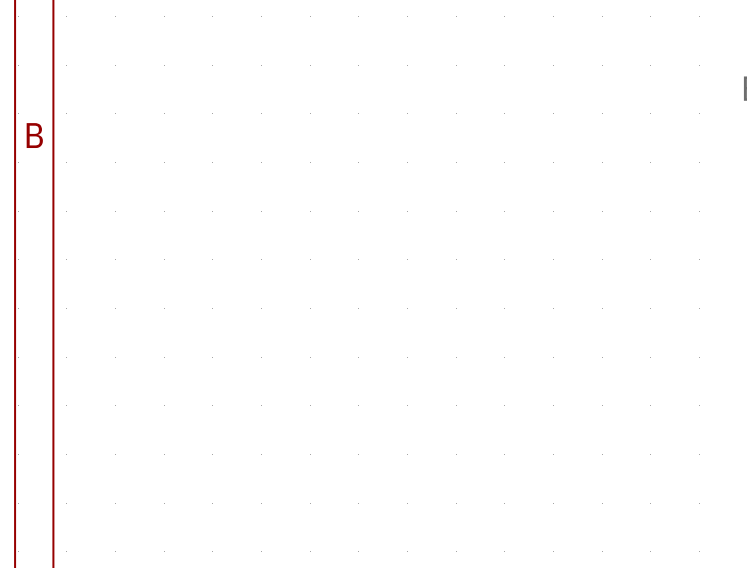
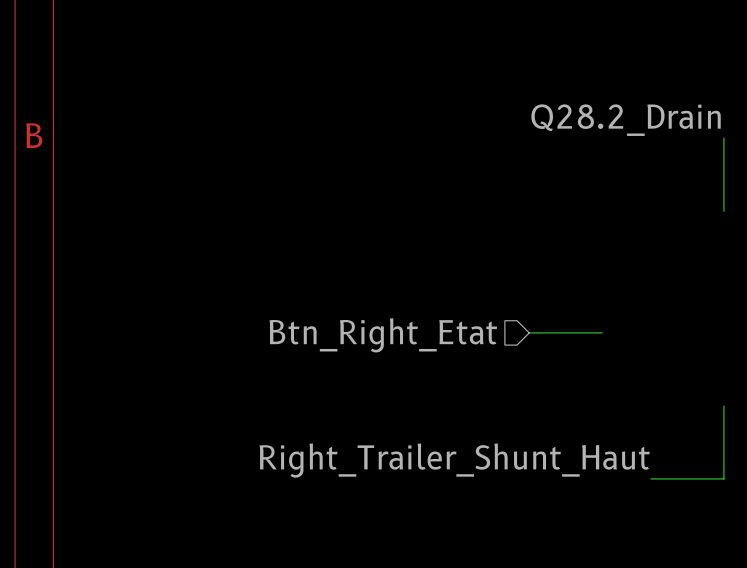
label: none -> Q28.2_Drain (626, 120)
wire: none -> (723, 138) (723, 211)
wire: none -> (529, 332) (602, 332)
hierarchical label: none -> Btn_Right_Etat (383, 335)
wire: none -> (723, 405) (723, 478) (650, 478)
label: none -> Right_Trailer_Shunt_Haut (454, 460)

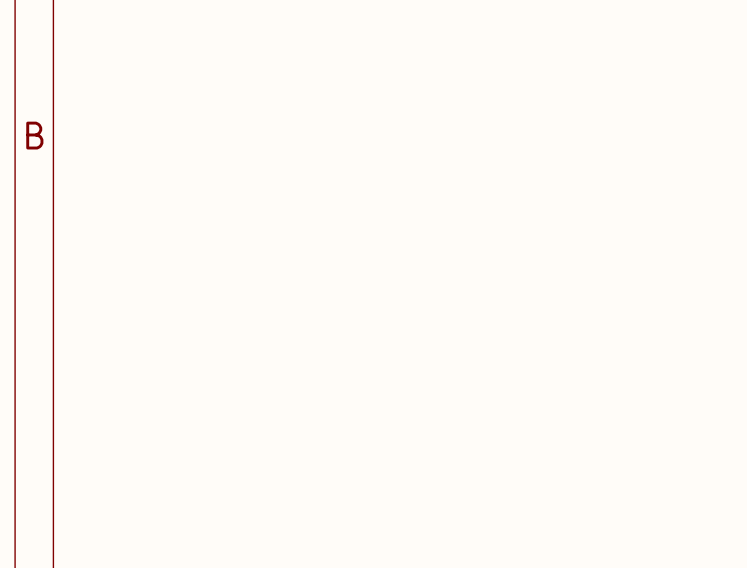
label: Q28.2_Drain (626, 120) -> none
wire: (723, 138) (723, 211) -> none
wire: (529, 332) (602, 332) -> none
hierarchical label: Btn_Right_Etat (383, 335) -> none
wire: (723, 405) (723, 478) (650, 478) -> none
label: Right_Trailer_Shunt_Haut (454, 460) -> none

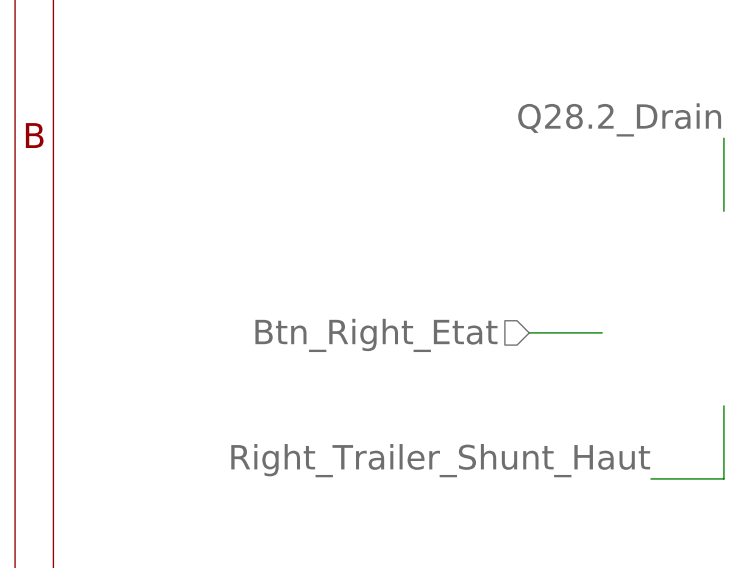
label: none -> Q28.2_Drain (619, 119)
wire: none -> (723, 138) (723, 211)
wire: none -> (529, 332) (602, 332)
hierarchical label: none -> Btn_Right_Etat (376, 335)
wire: none -> (723, 405) (723, 478) (650, 478)
label: none -> Right_Trailer_Shunt_Haut (440, 460)

